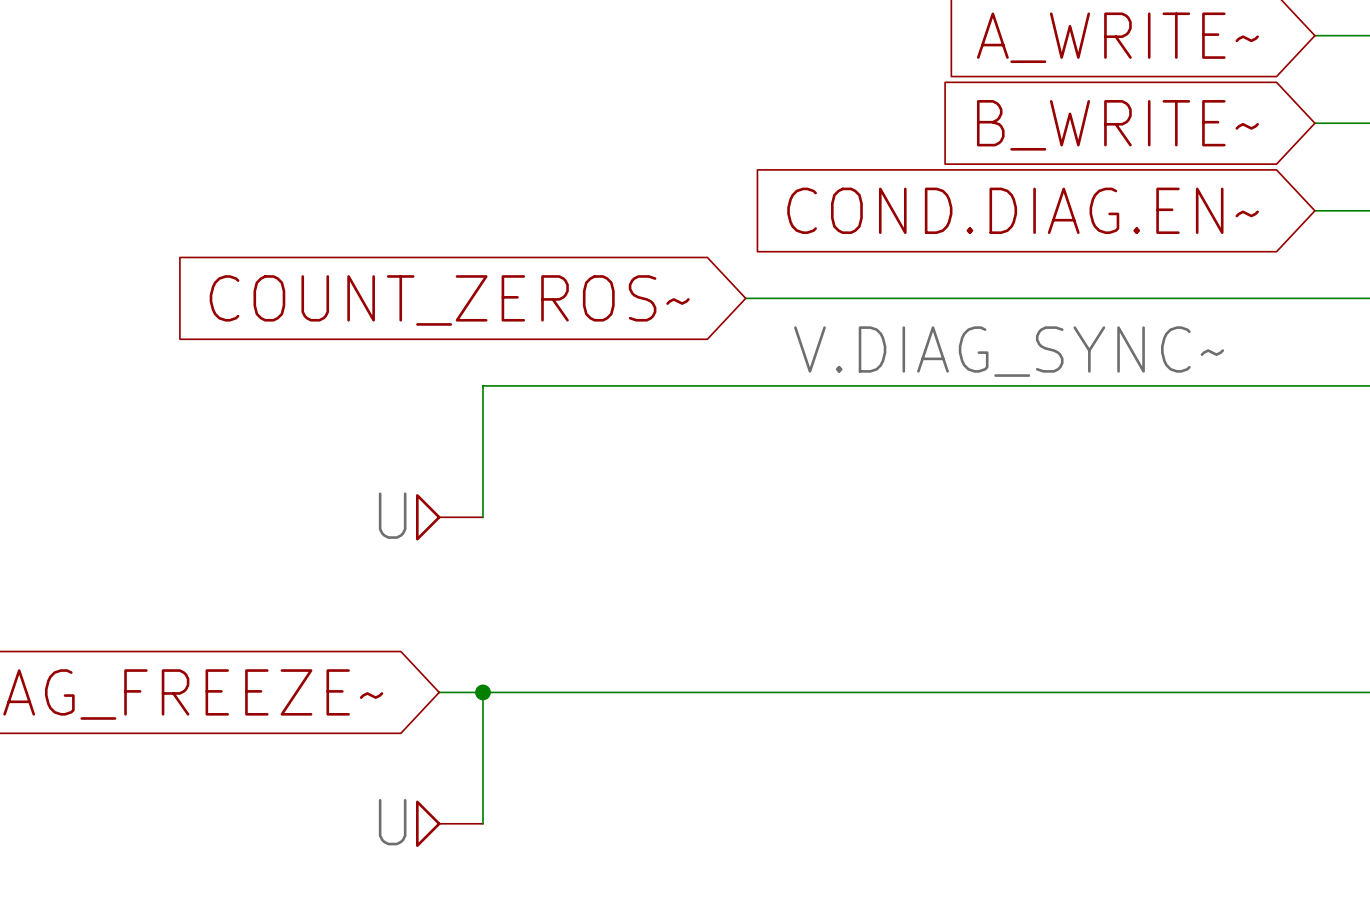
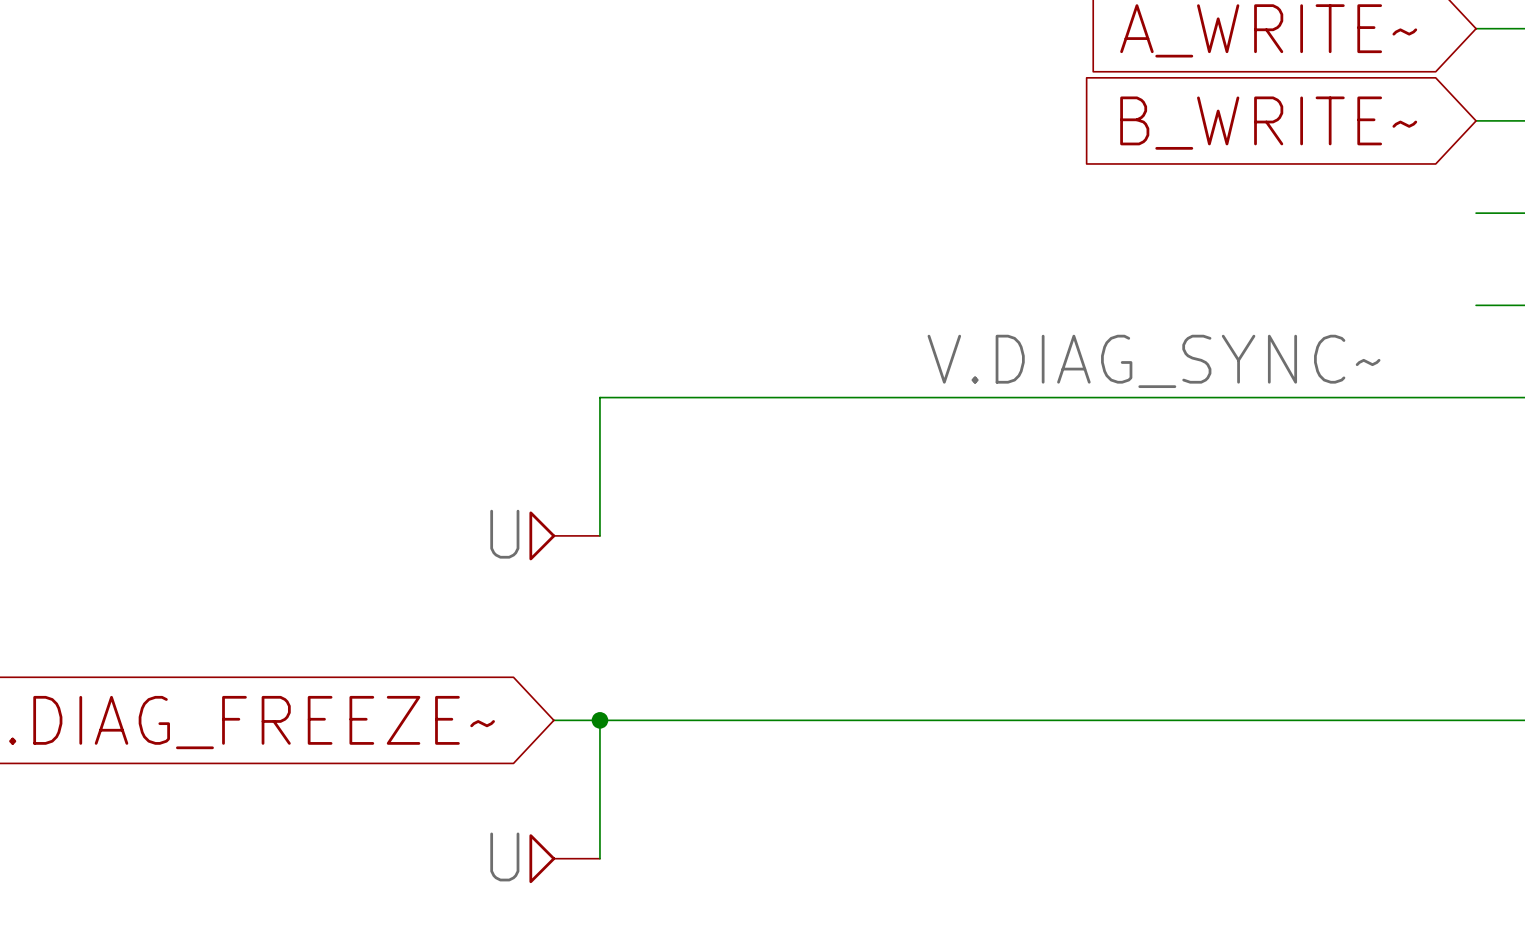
global label: COND.DIAG.EN~ (1023, 210) -> none
wire: (745, 298) (1314, 298) -> none
global label: COUNT_ZEROS~ (449, 300) -> none

